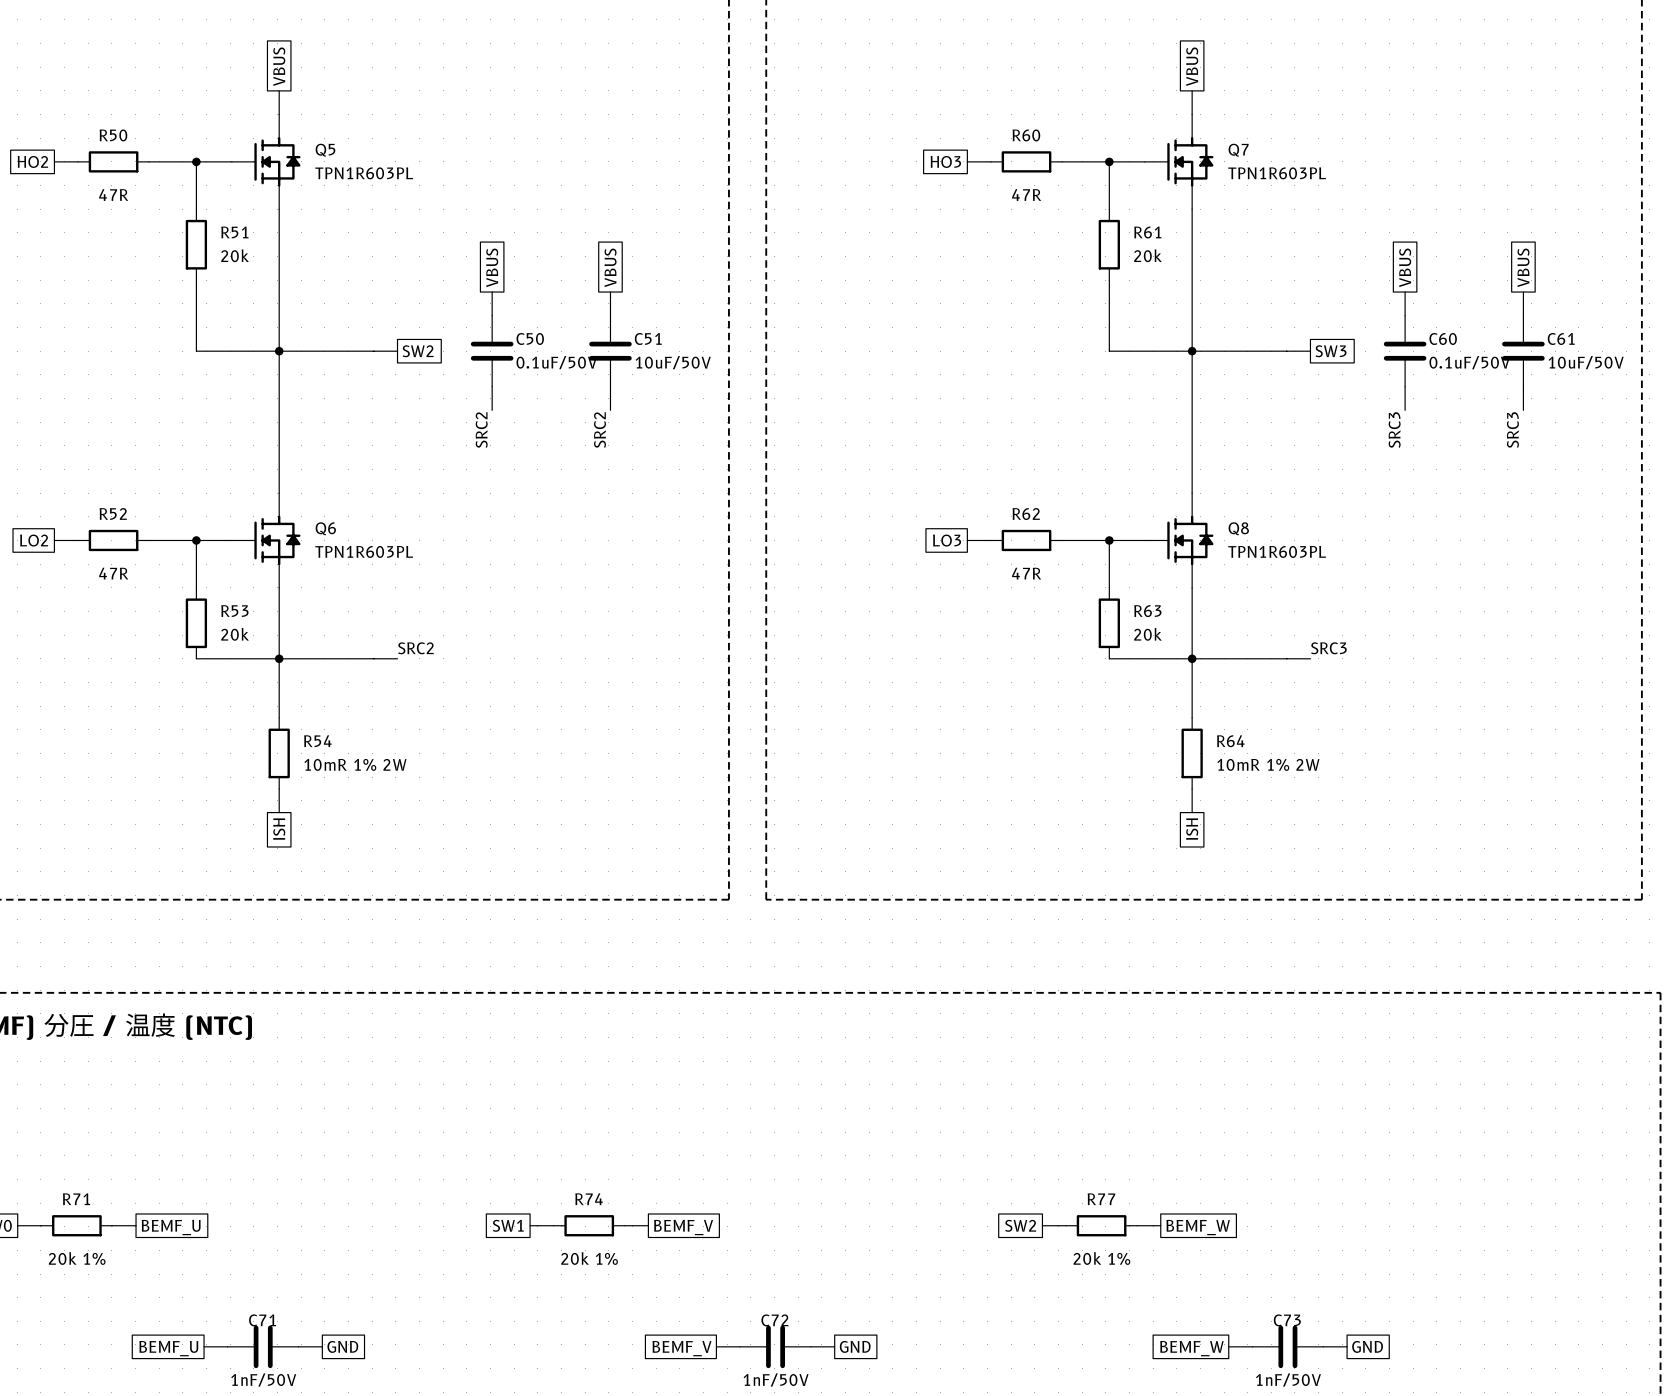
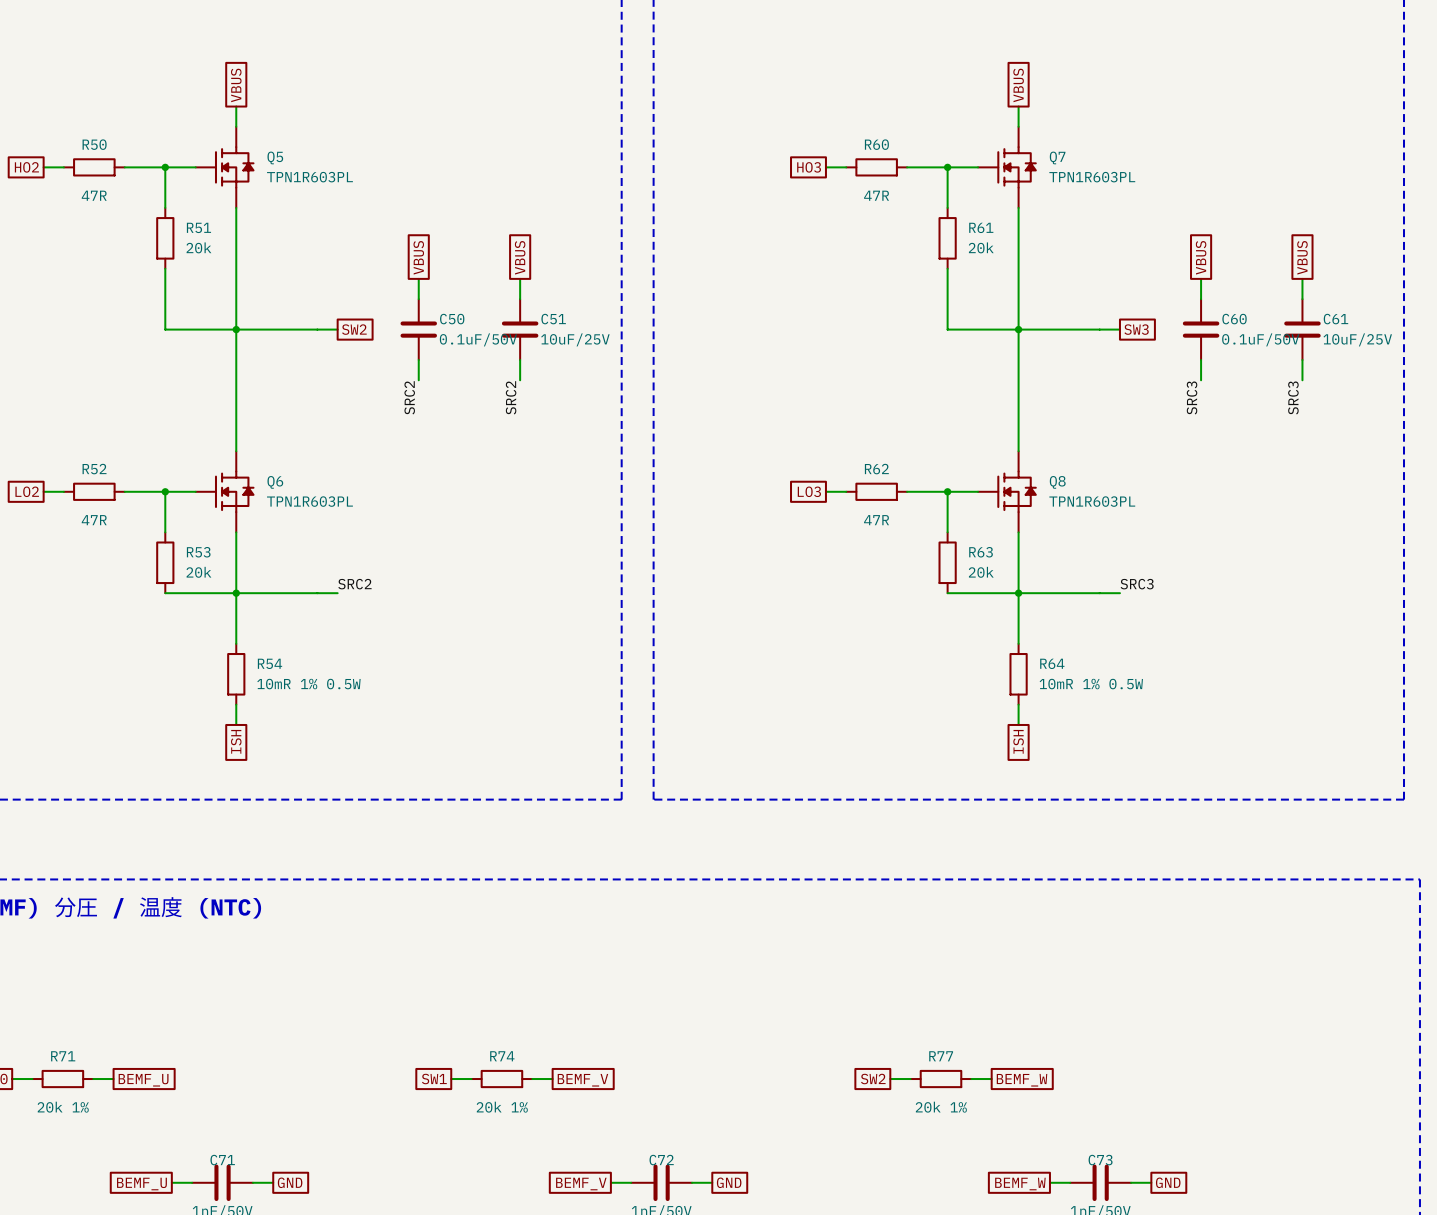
C51 value: 10uF/50V (673, 362) -> 10uF/25V (575, 339)
C61 value: 10uF/50V (1586, 362) -> 10uF/25V (1357, 339)
R54 value: 10mR 1% 2W (355, 764) -> 10mR 1% 0.5W (308, 684)
R64 value: 10mR 1% 2W (1268, 764) -> 10mR 1% 0.5W (1091, 684)

